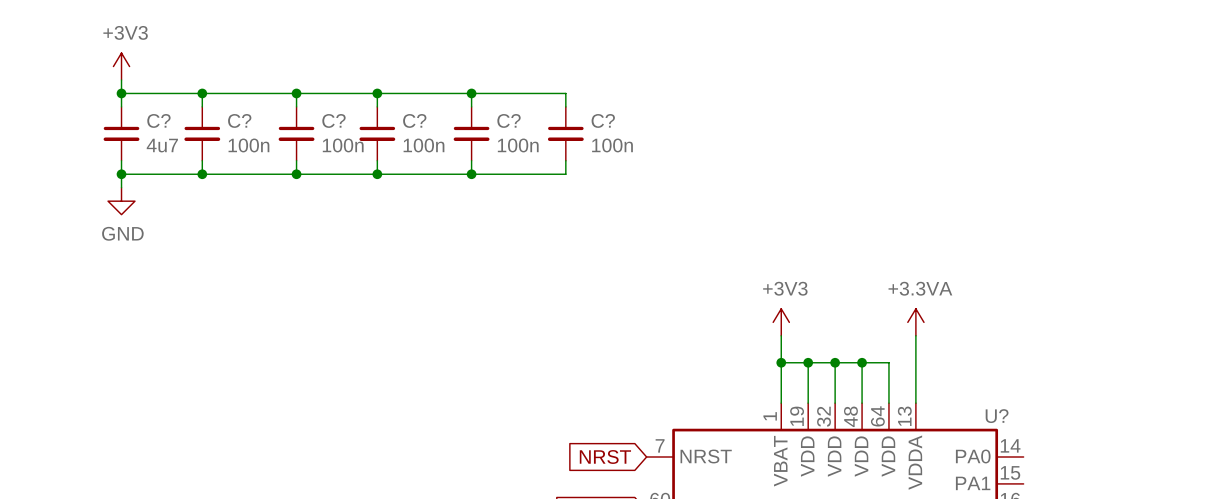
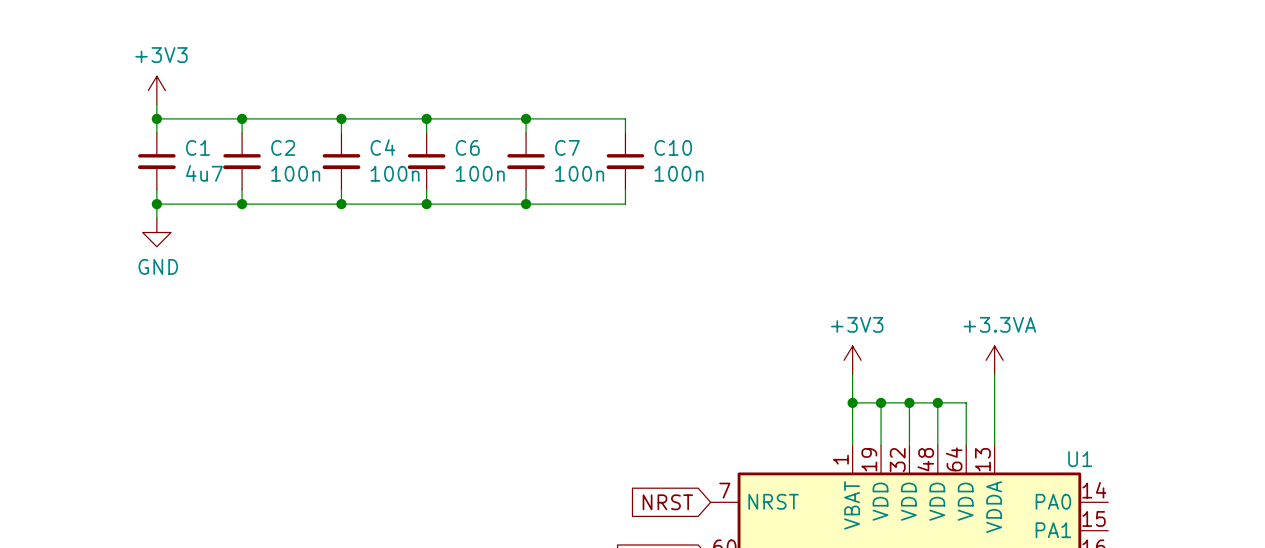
C? name: C? (158, 120) -> C1 (197, 147)
C? name: C? (239, 120) -> C2 (283, 147)
C? name: C? (333, 120) -> C4 (382, 147)
C? name: C? (414, 120) -> C6 (467, 147)
C? name: C? (509, 120) -> C7 (567, 147)
C? name: C? (603, 120) -> C10 (673, 147)
U? name: U? (997, 416) -> U1 (1080, 459)

